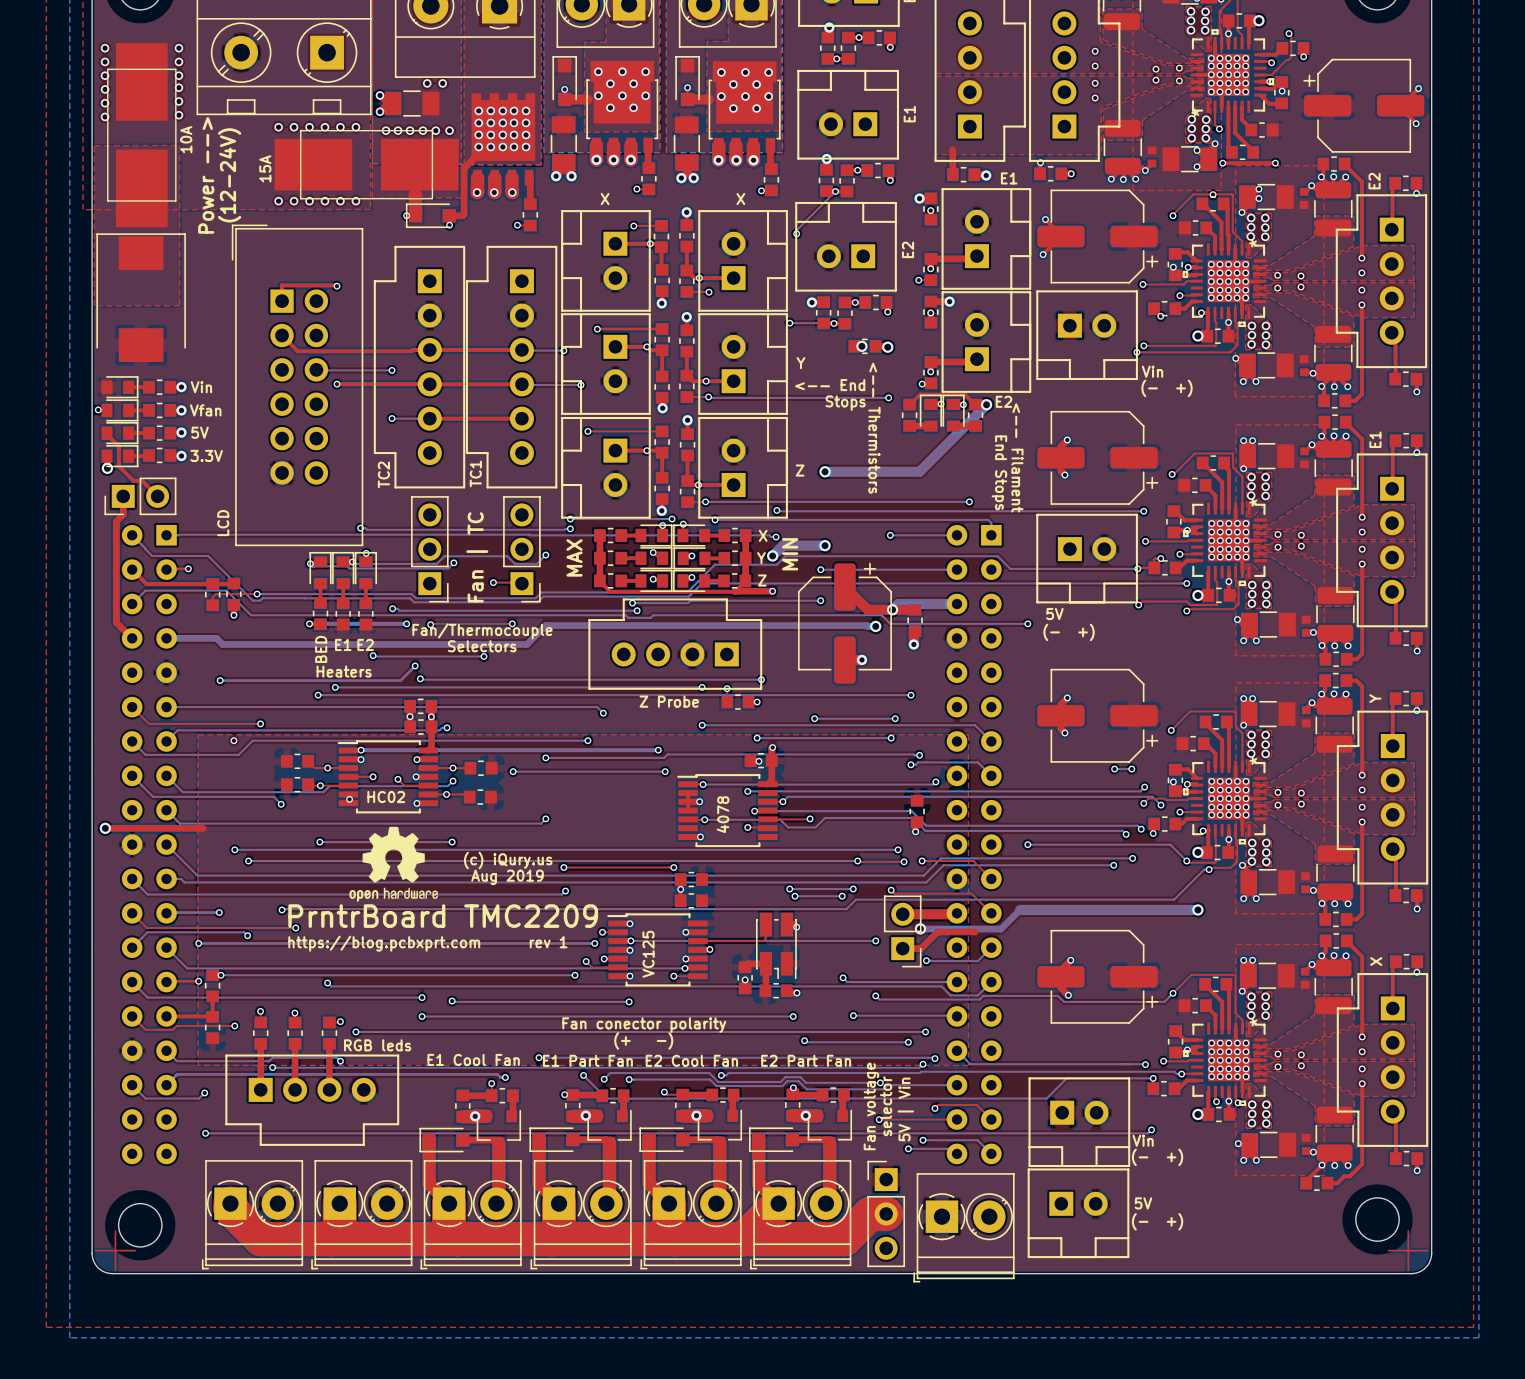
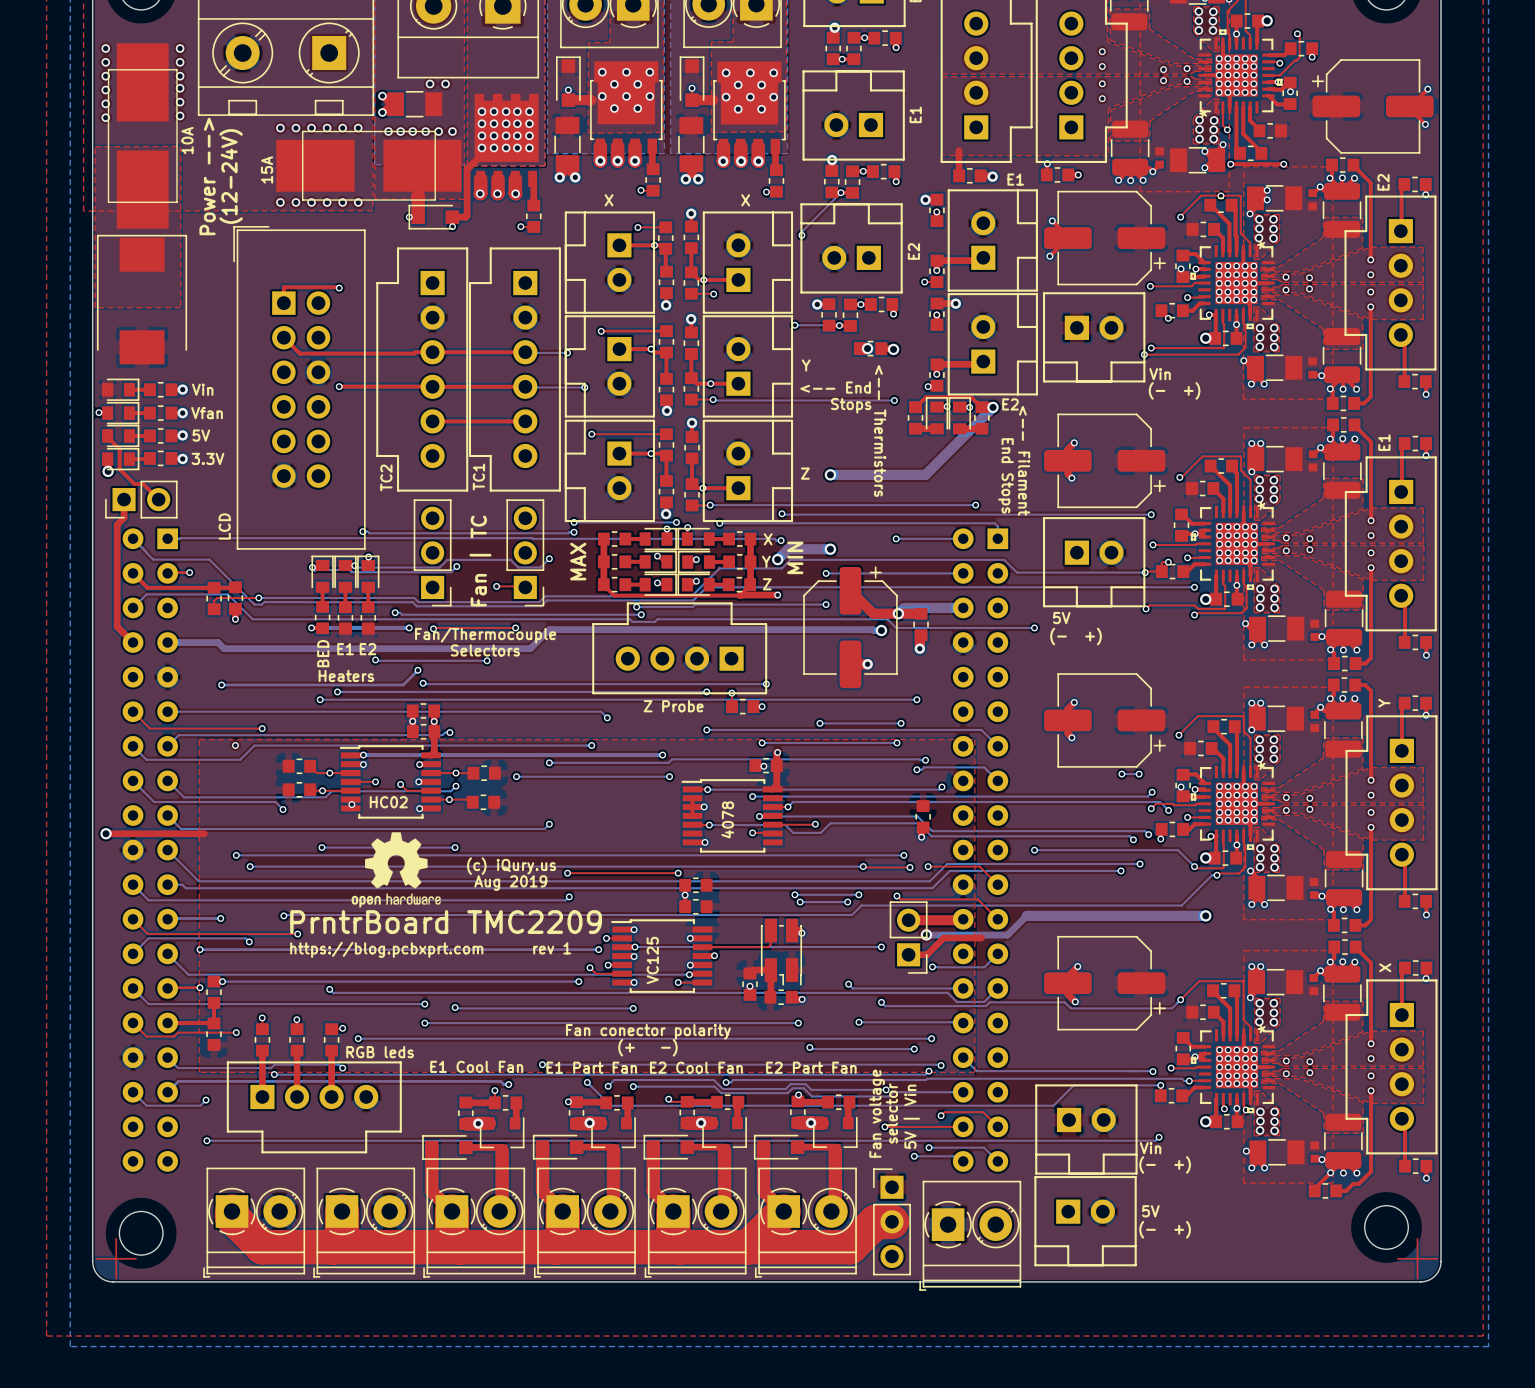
bottom track: (316, 369) (392, 370) -> none
via: (392, 370) -> none
bottom track: (392, 418) (429, 418) -> none
via: (392, 418) -> none

